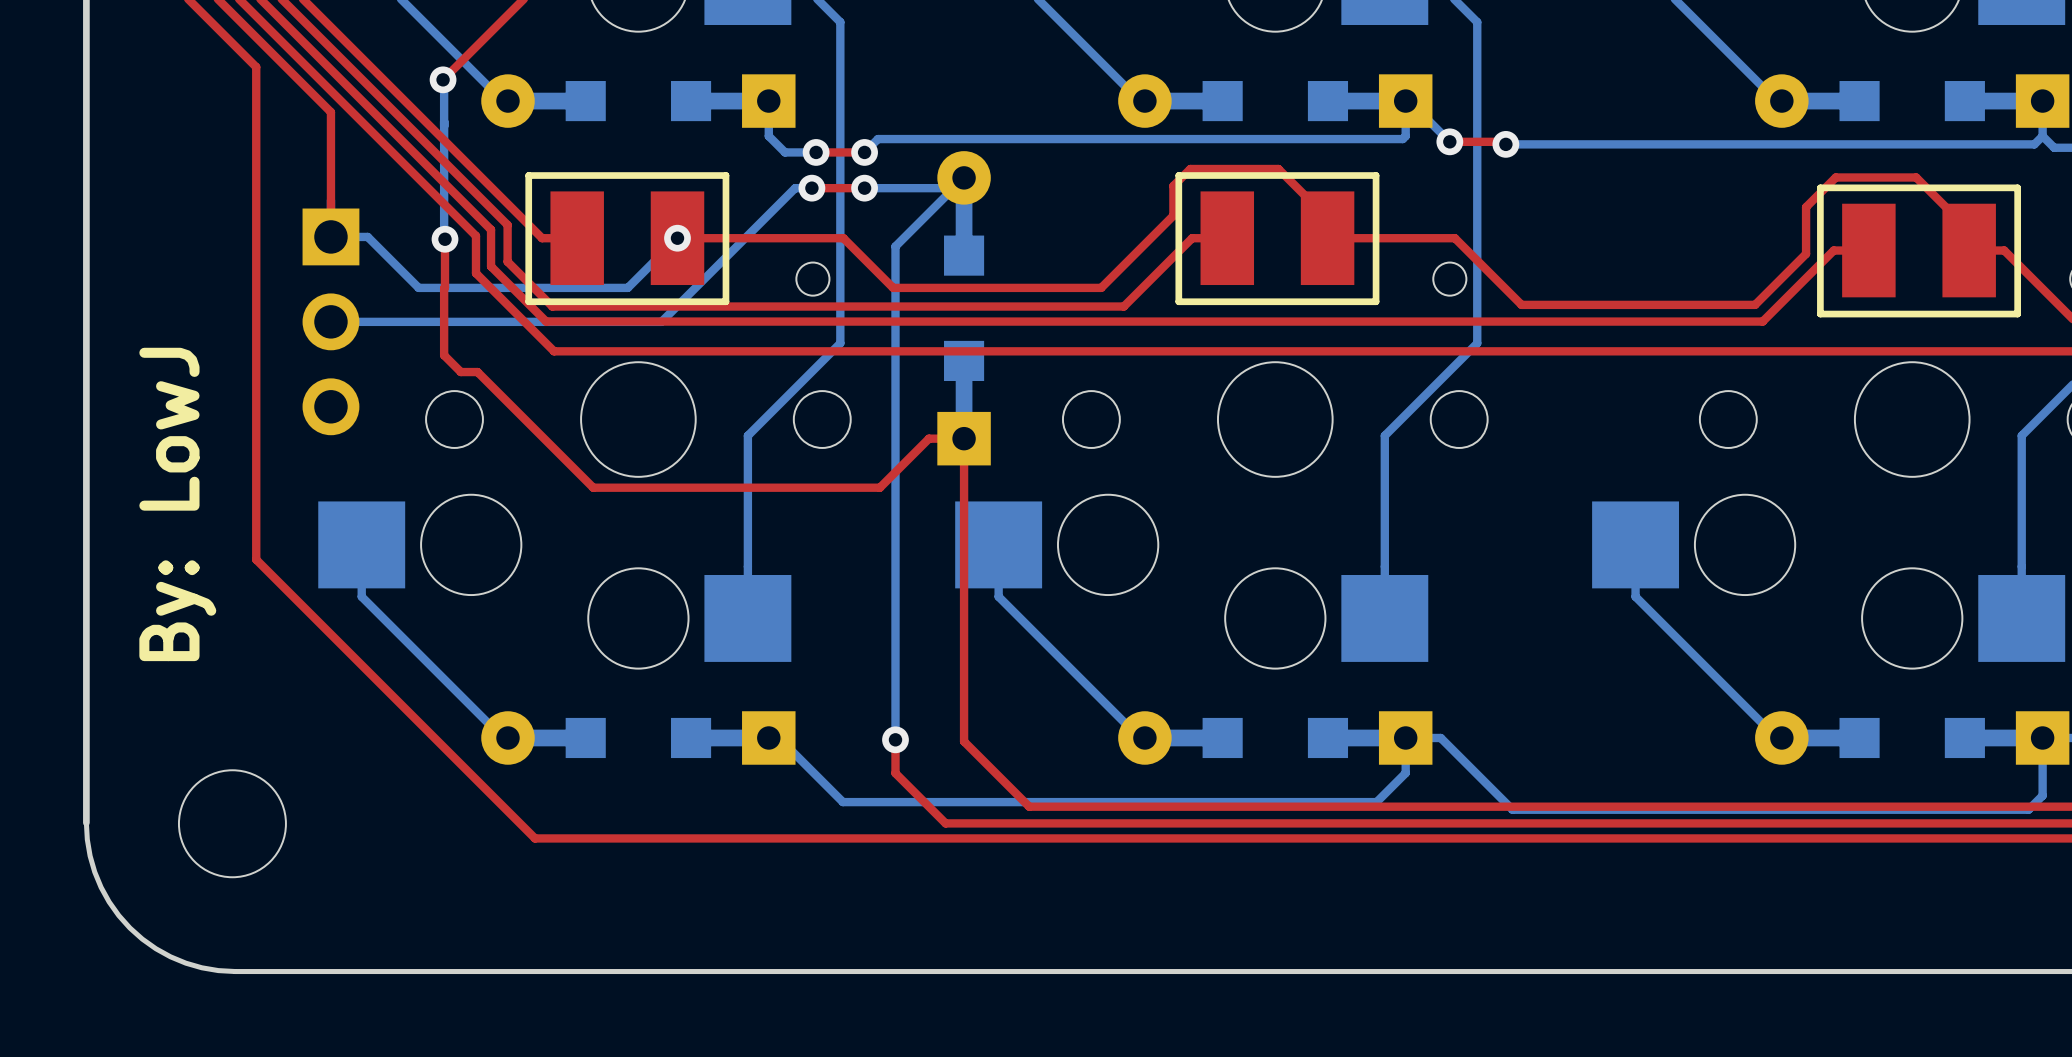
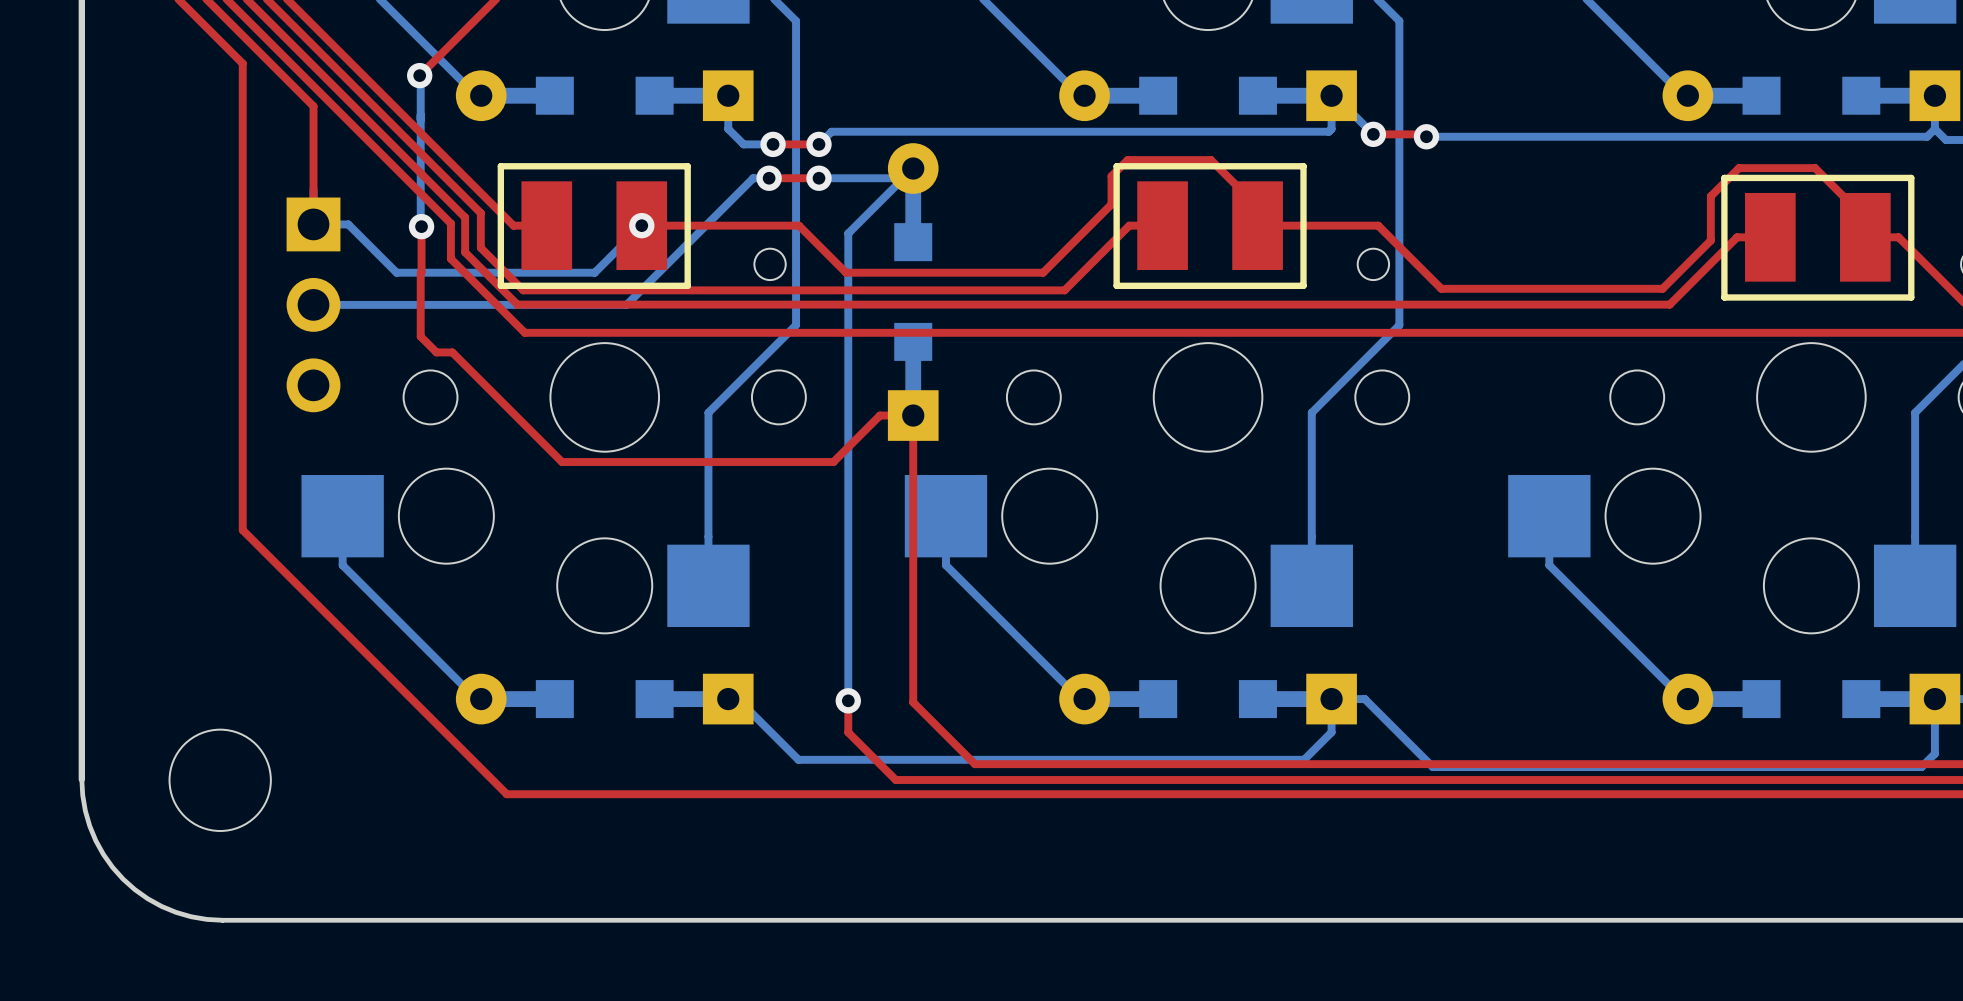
text: By: LowJ (177, 504) -> none

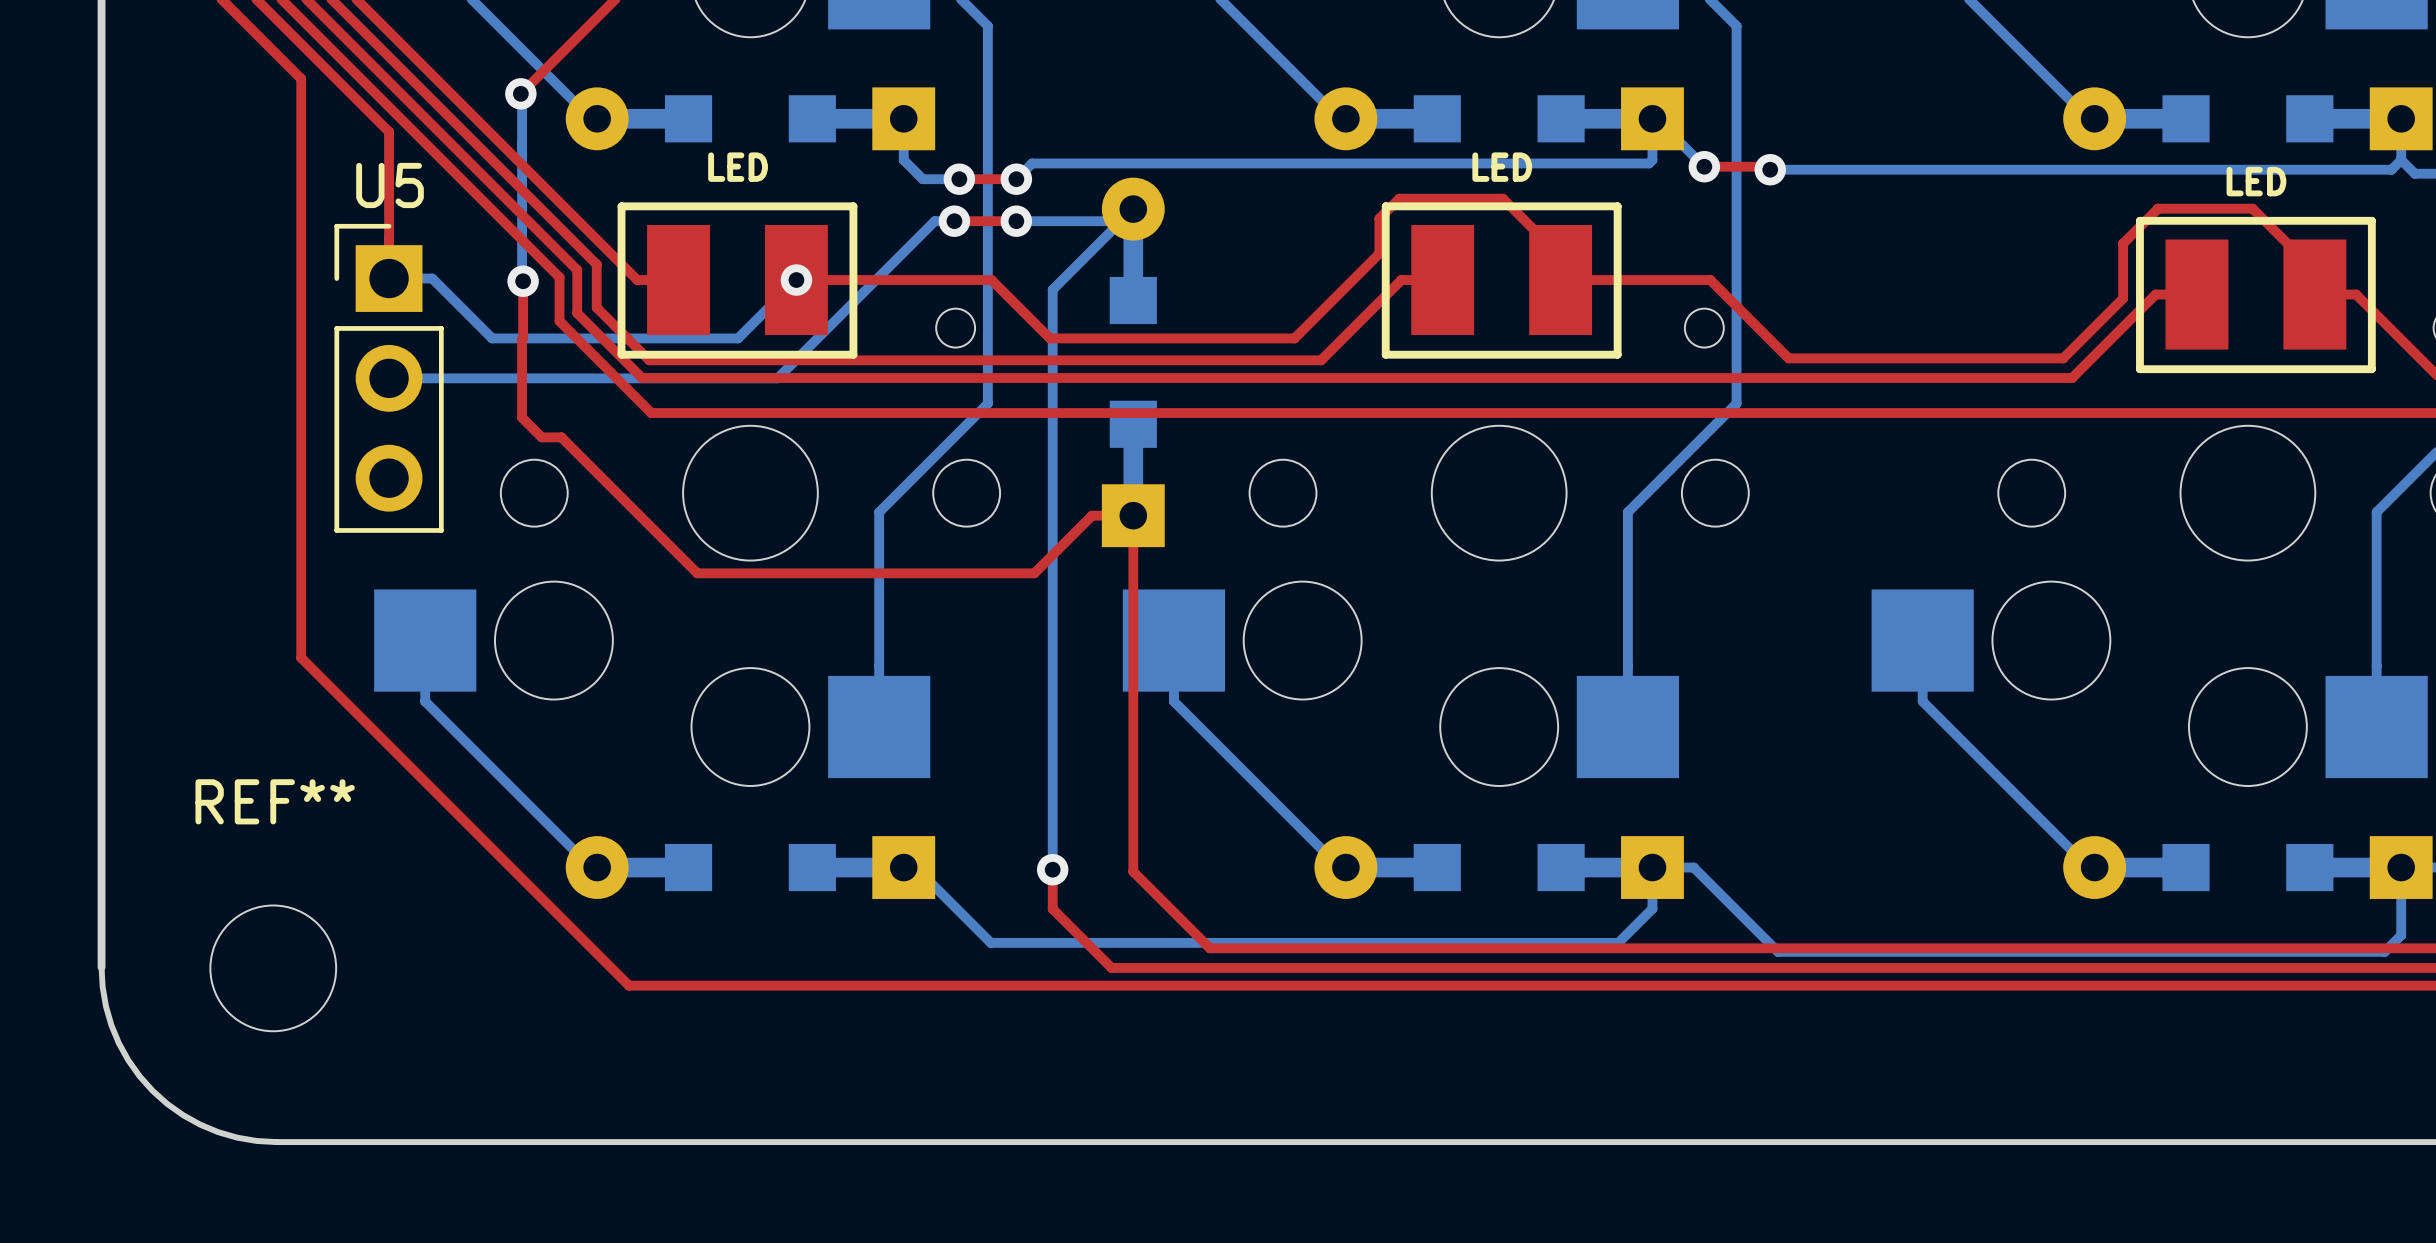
part value: none -> LED (738, 167)
part value: none -> LED (1502, 167)
part value: none -> LED (2256, 181)
U5 side: bottom (313, 304) -> top (389, 378)
REF** name: none -> REF** (275, 801)

